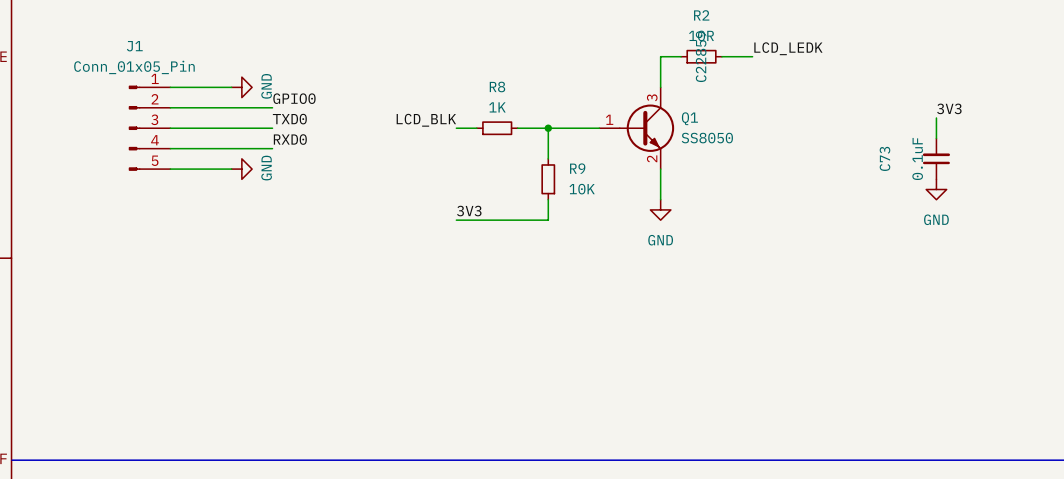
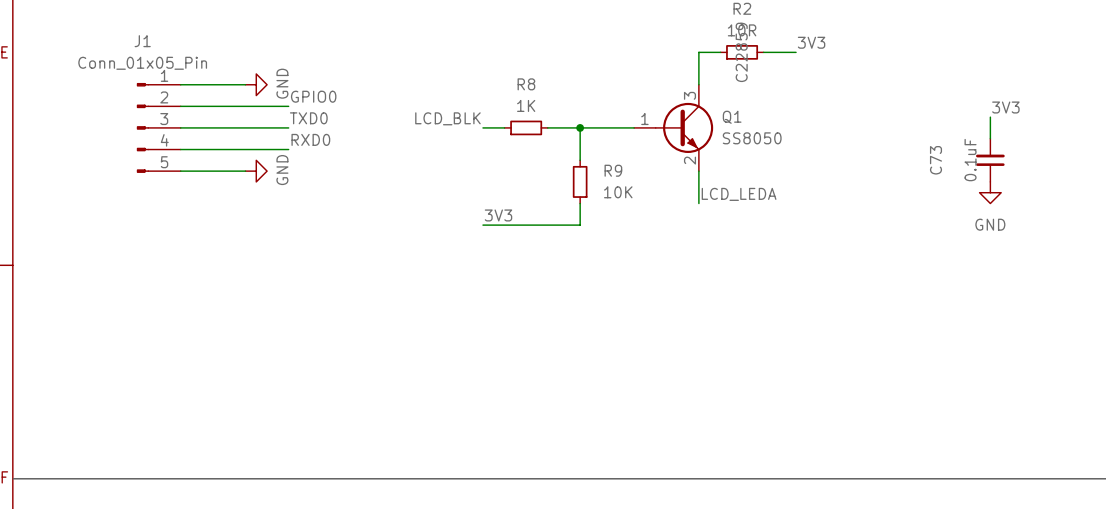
label: LCD_LEDK (788, 48) -> 3V3 (811, 42)
label: none -> LCD_LEDA (739, 194)
power symbol: GND (660, 209) -> none

